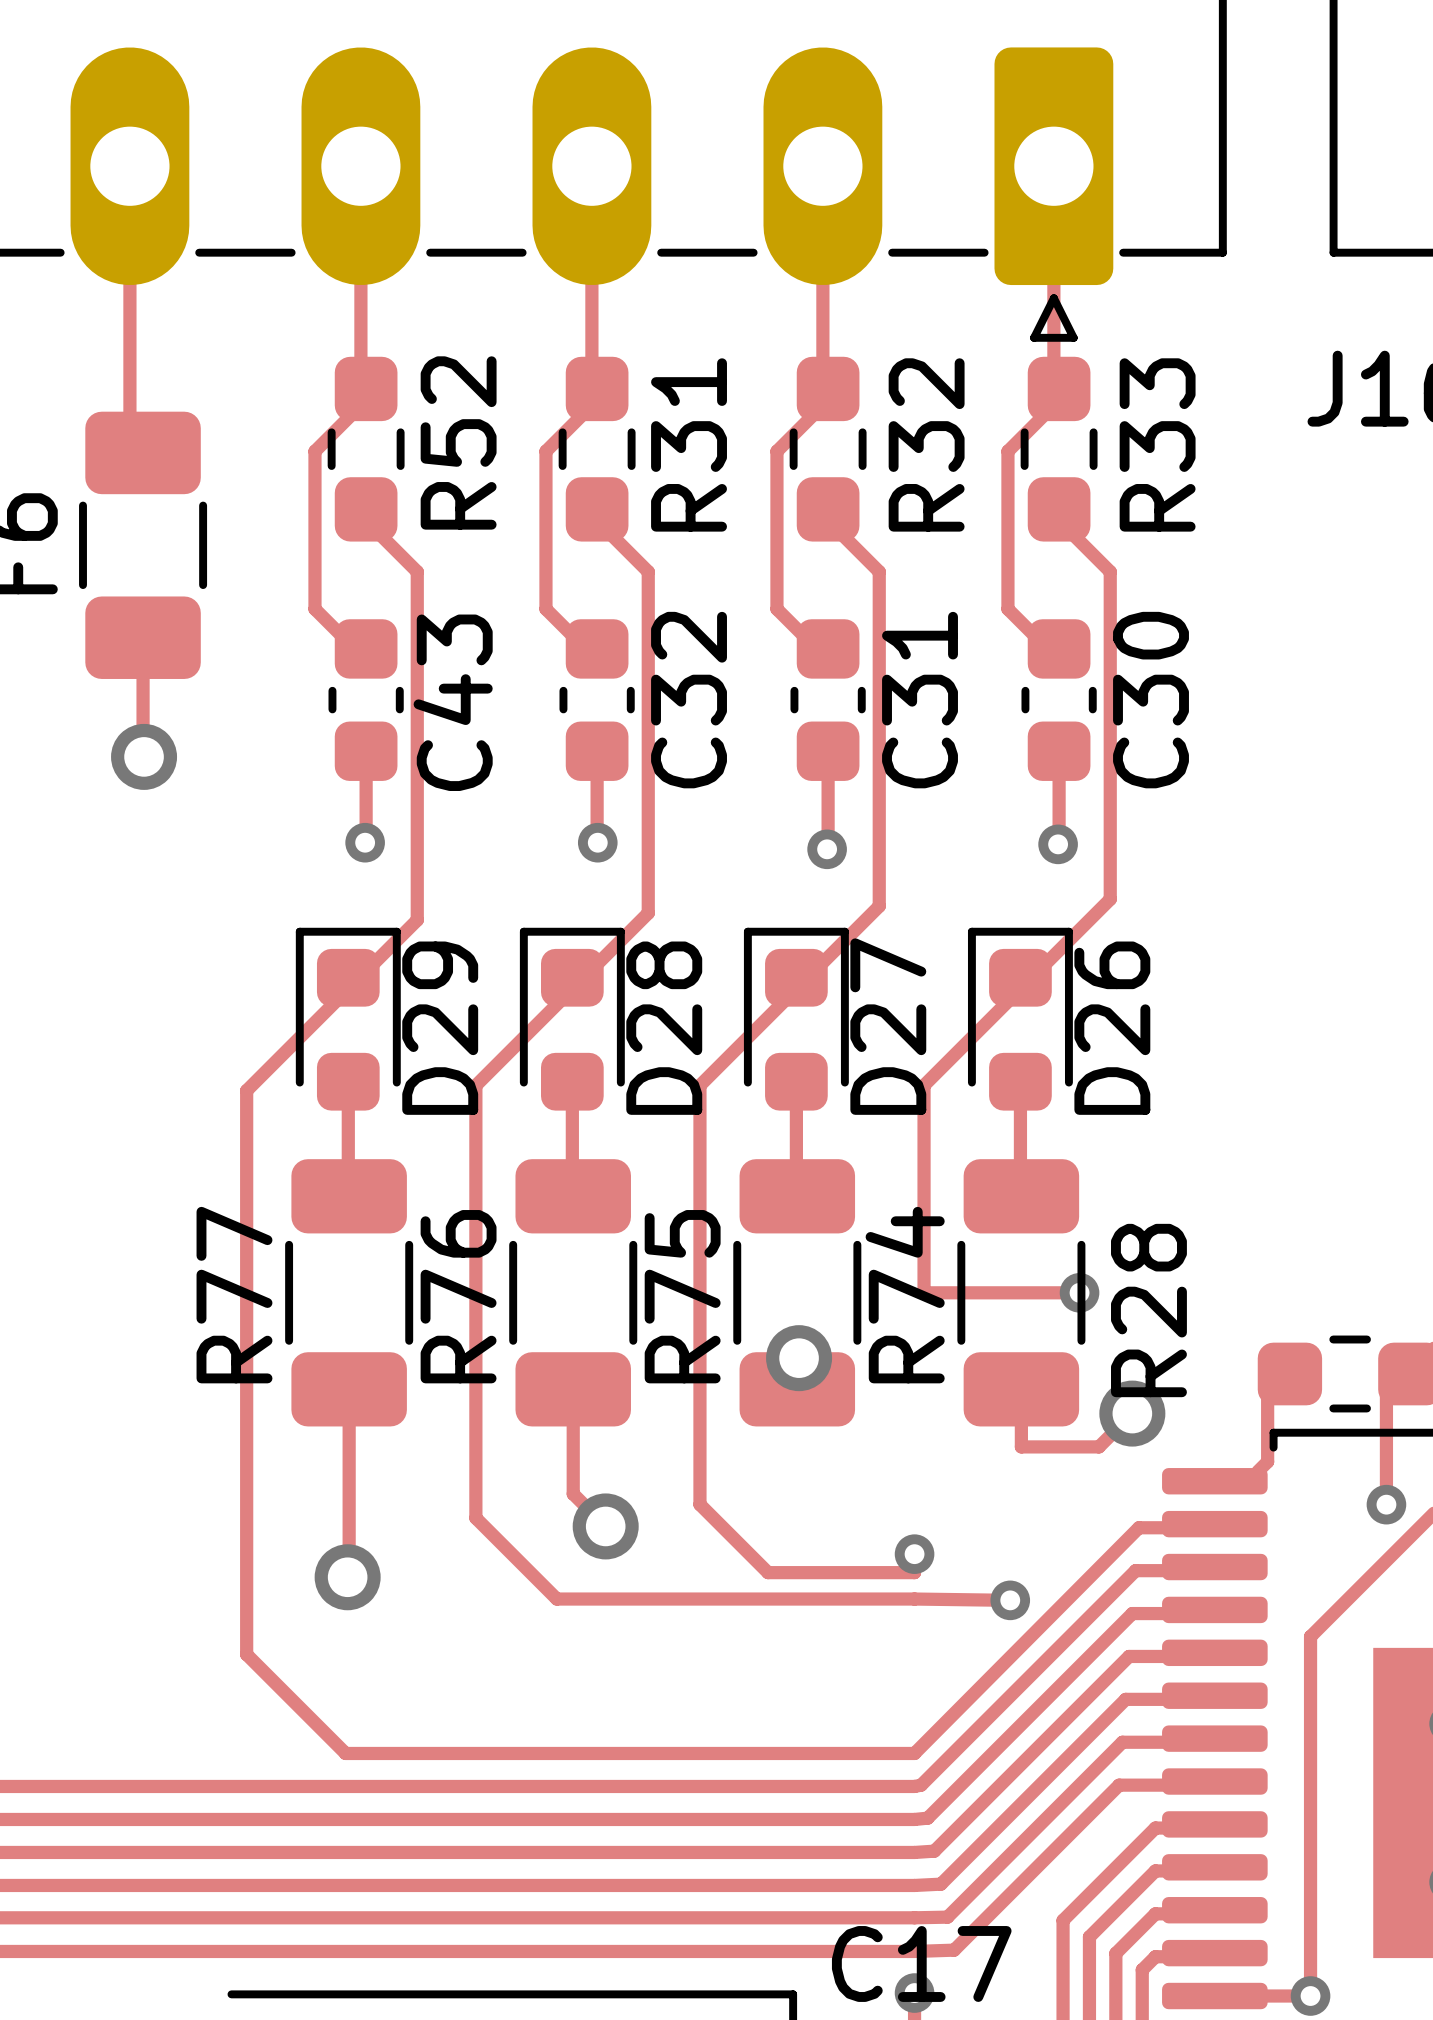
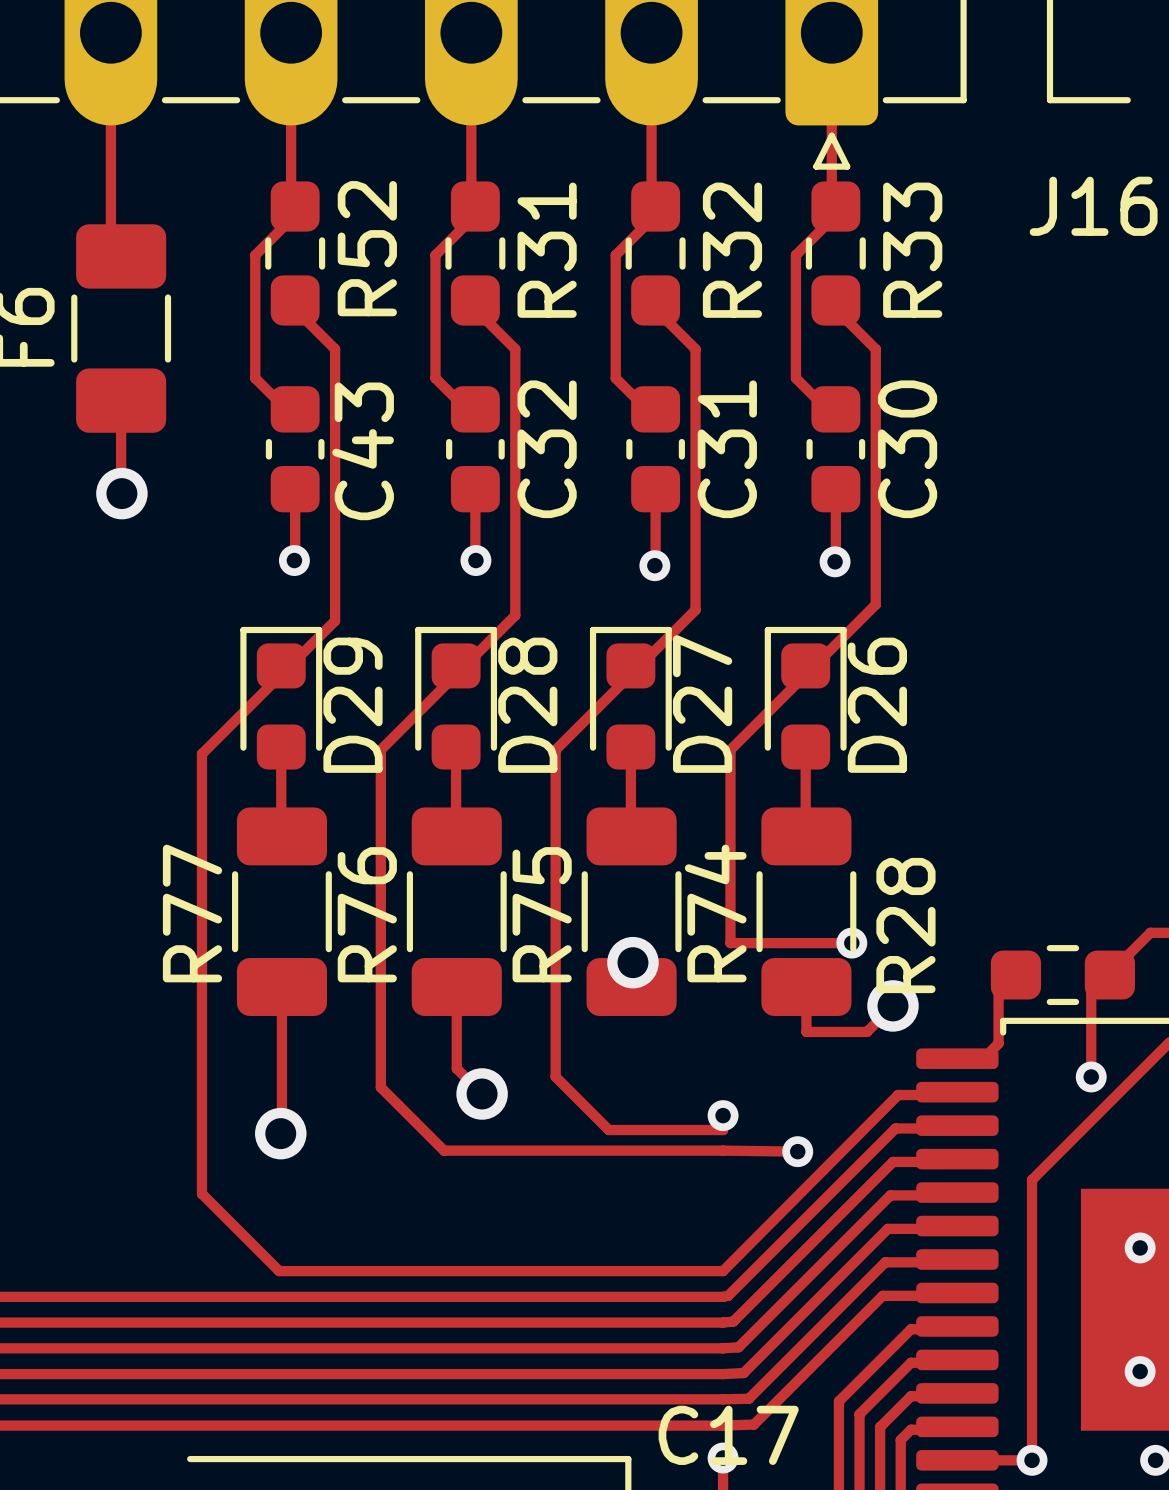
track: (924, 1292) (1079, 1292) -> (730, 911) (730, 943) (851, 943)
via position: (1079, 1292) -> (851, 943)

